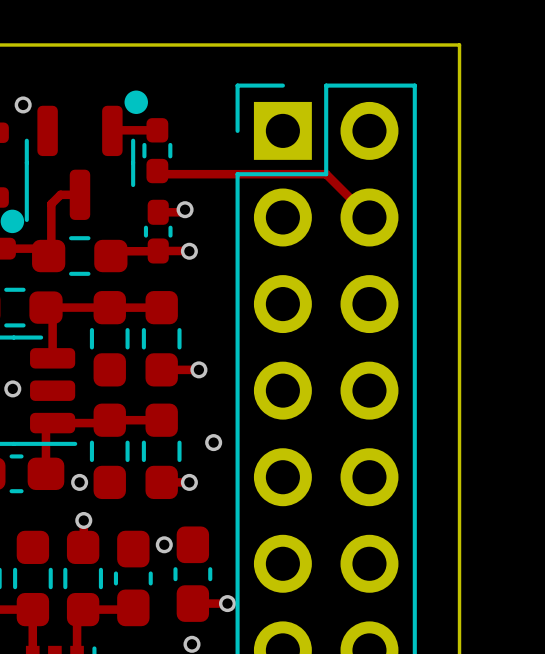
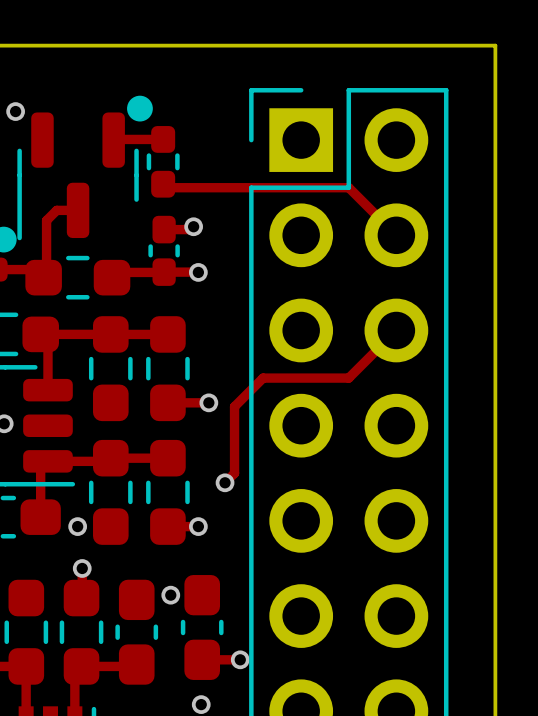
track: none -> (396, 330) (348, 378) (263, 378) (234, 406) (234, 473) (225, 482)

